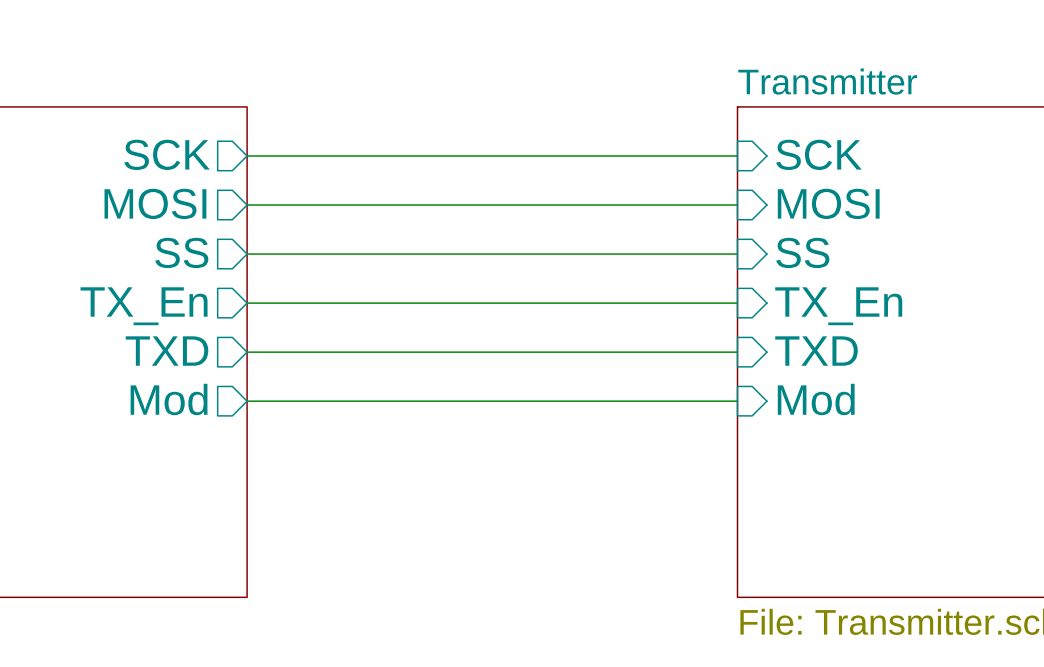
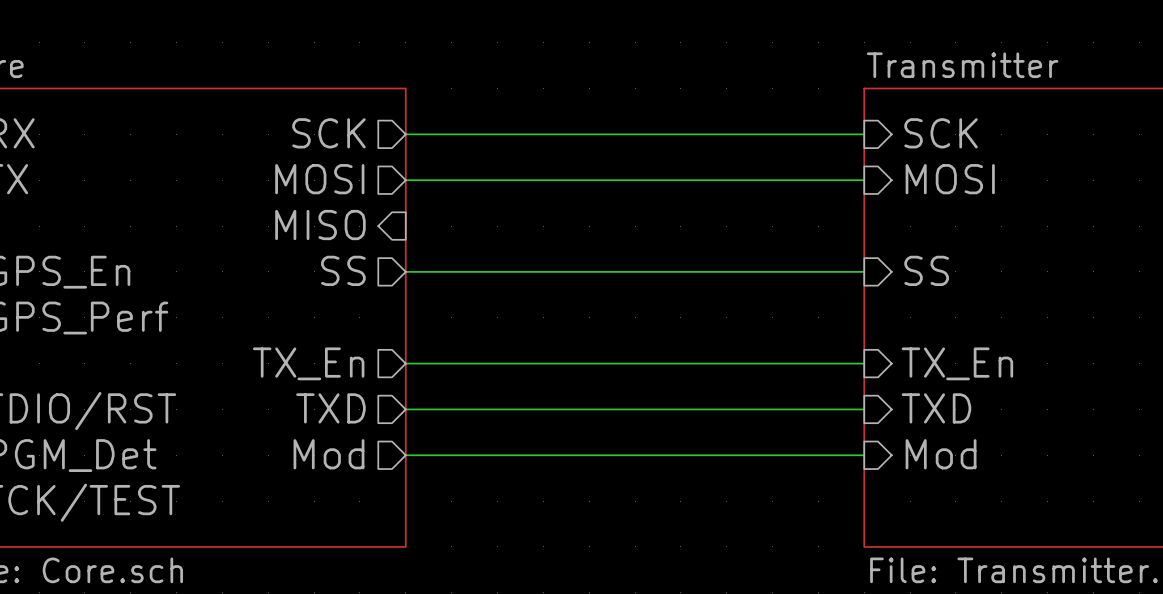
sheet pin shape: output (181, 252) -> input (320, 225)
sheet pin: SS (181, 252) -> MISO (320, 225)
sheet pin: SS (802, 252) -> none
wire: (247, 254) (737, 254) -> (405, 455) (864, 455)
sheet pin: TX_En (144, 306) -> SS (343, 270)
sheet pin: TX_En (838, 306) -> SS (926, 270)
sheet pin position: TXD (167, 351) -> TXD (330, 408)
sheet pin position: TXD (816, 351) -> TXD (936, 408)
wire: (247, 352) (737, 352) -> (405, 409) (864, 409)
sheet pin: Mod (169, 399) -> TX_En (308, 363)
sheet pin: Mod (816, 399) -> TX_En (957, 363)
sheet pin: none -> Mod (328, 454)
sheet pin: none -> Mod (941, 454)

